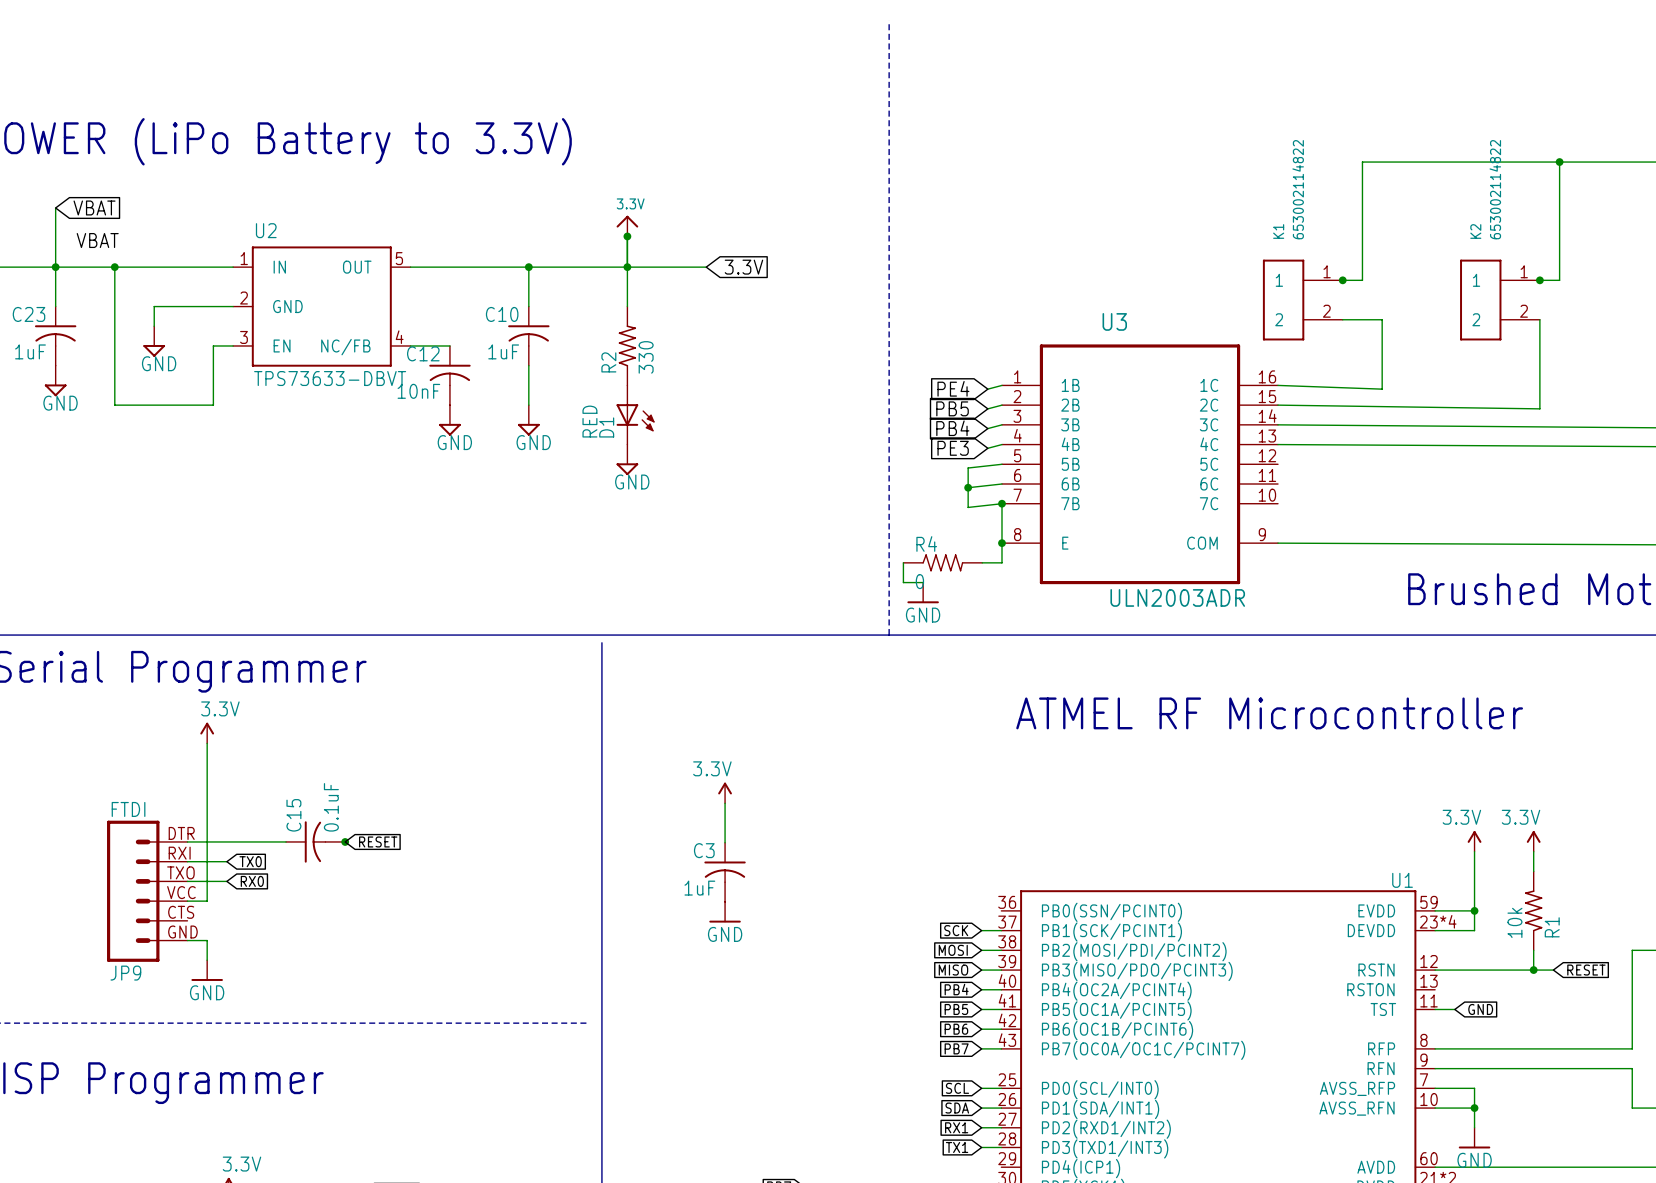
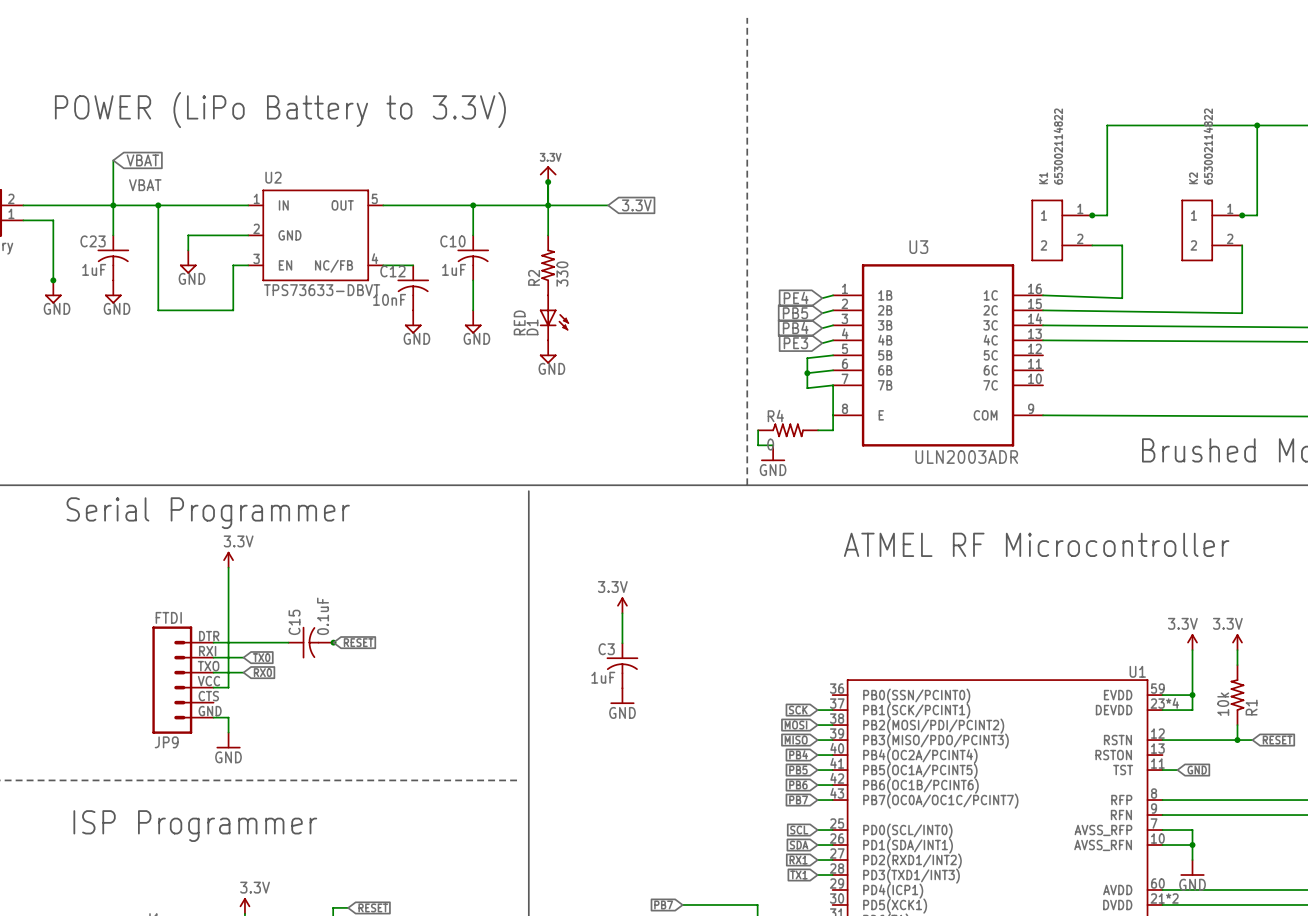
junction: (1001, 503) -> none
junction: (1001, 543) -> none

